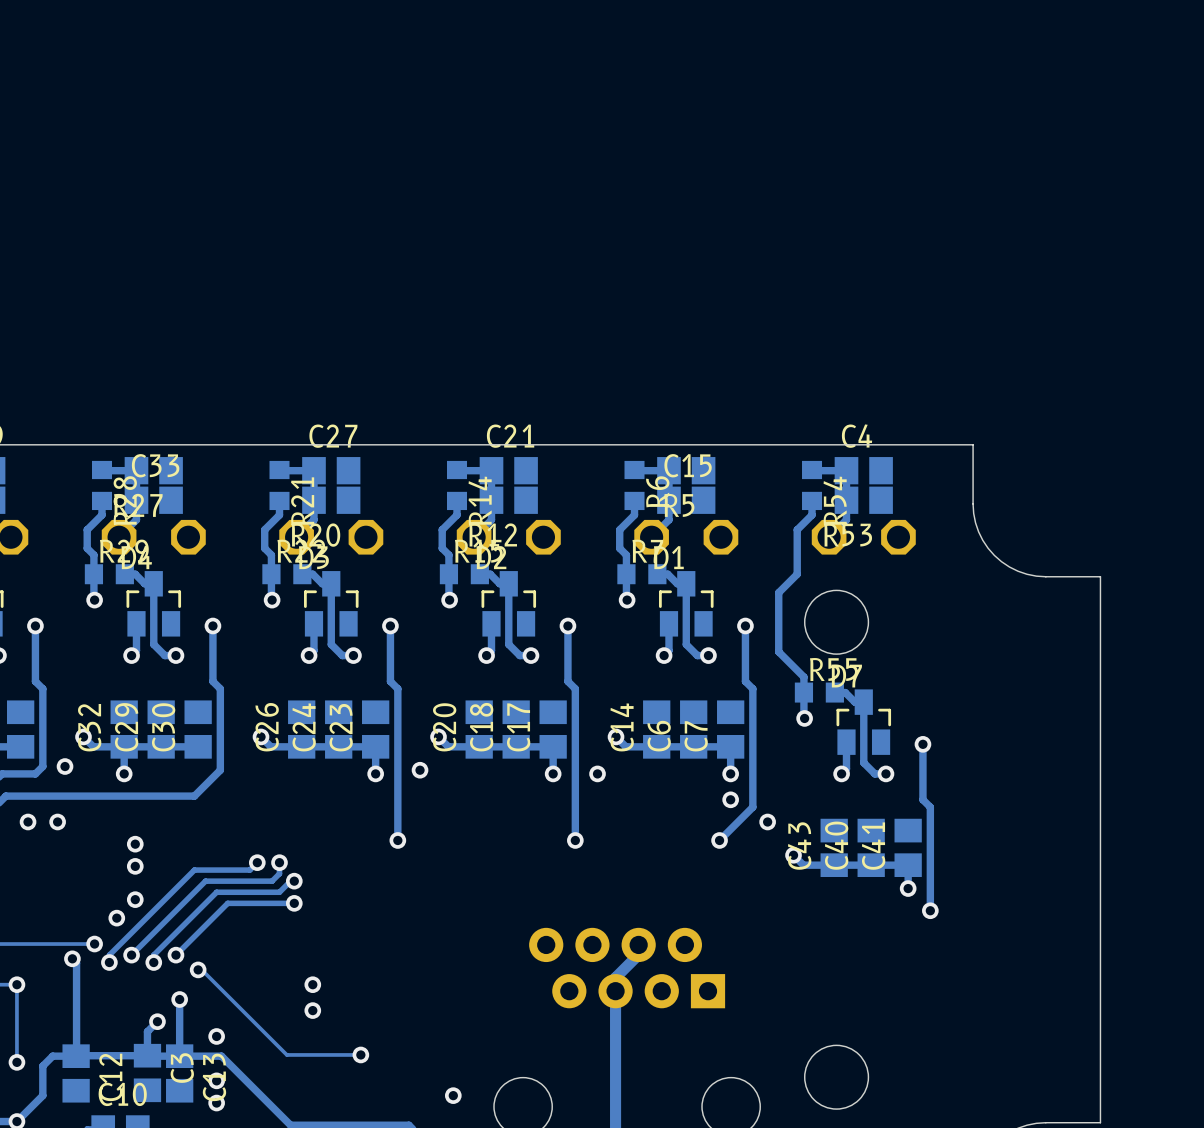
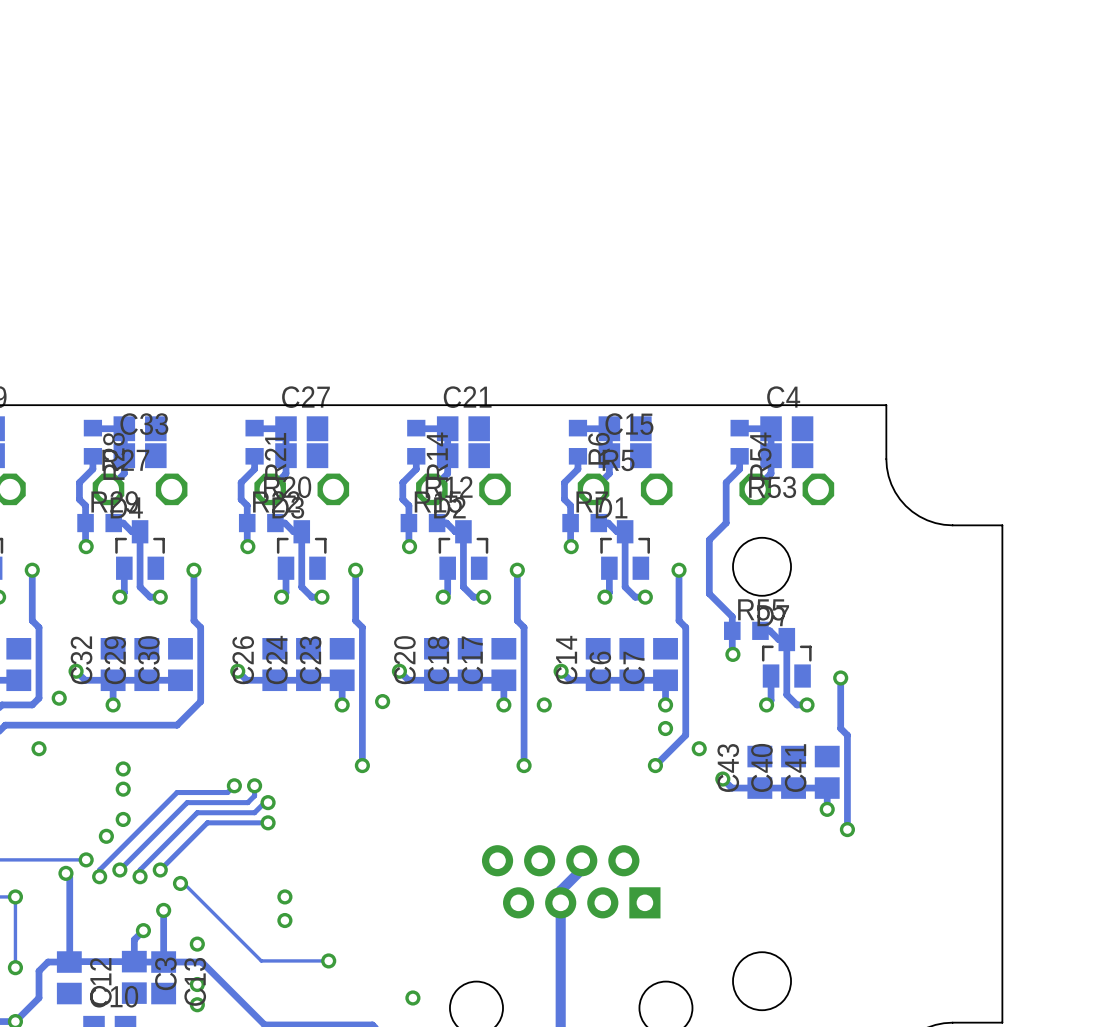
via: (28, 821) -> none
via: none -> (39, 748)
via: (57, 821) -> none

